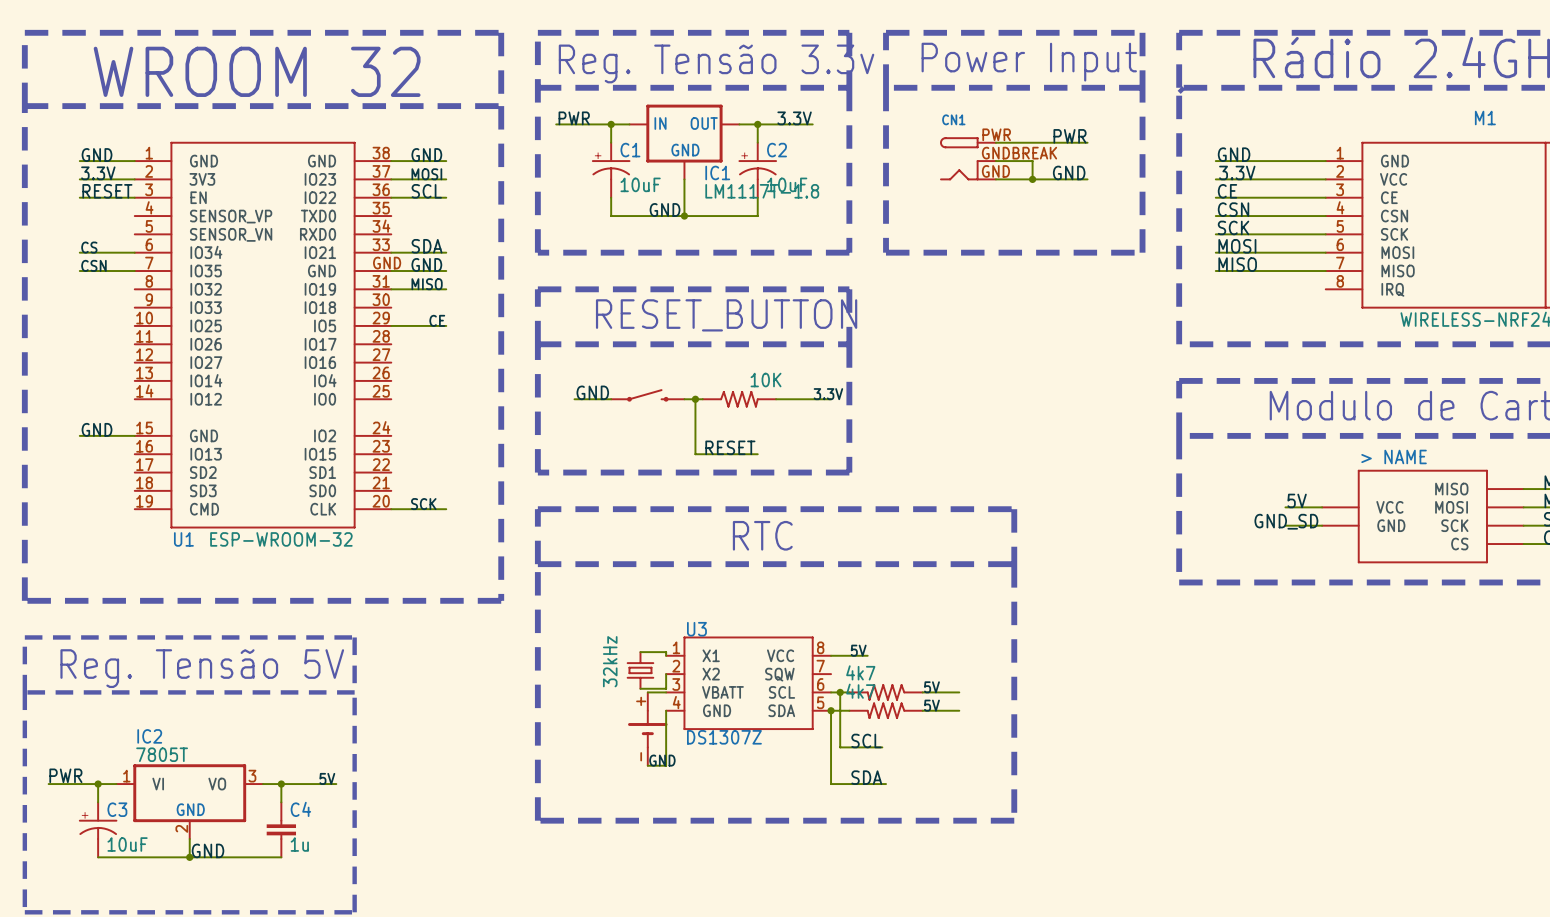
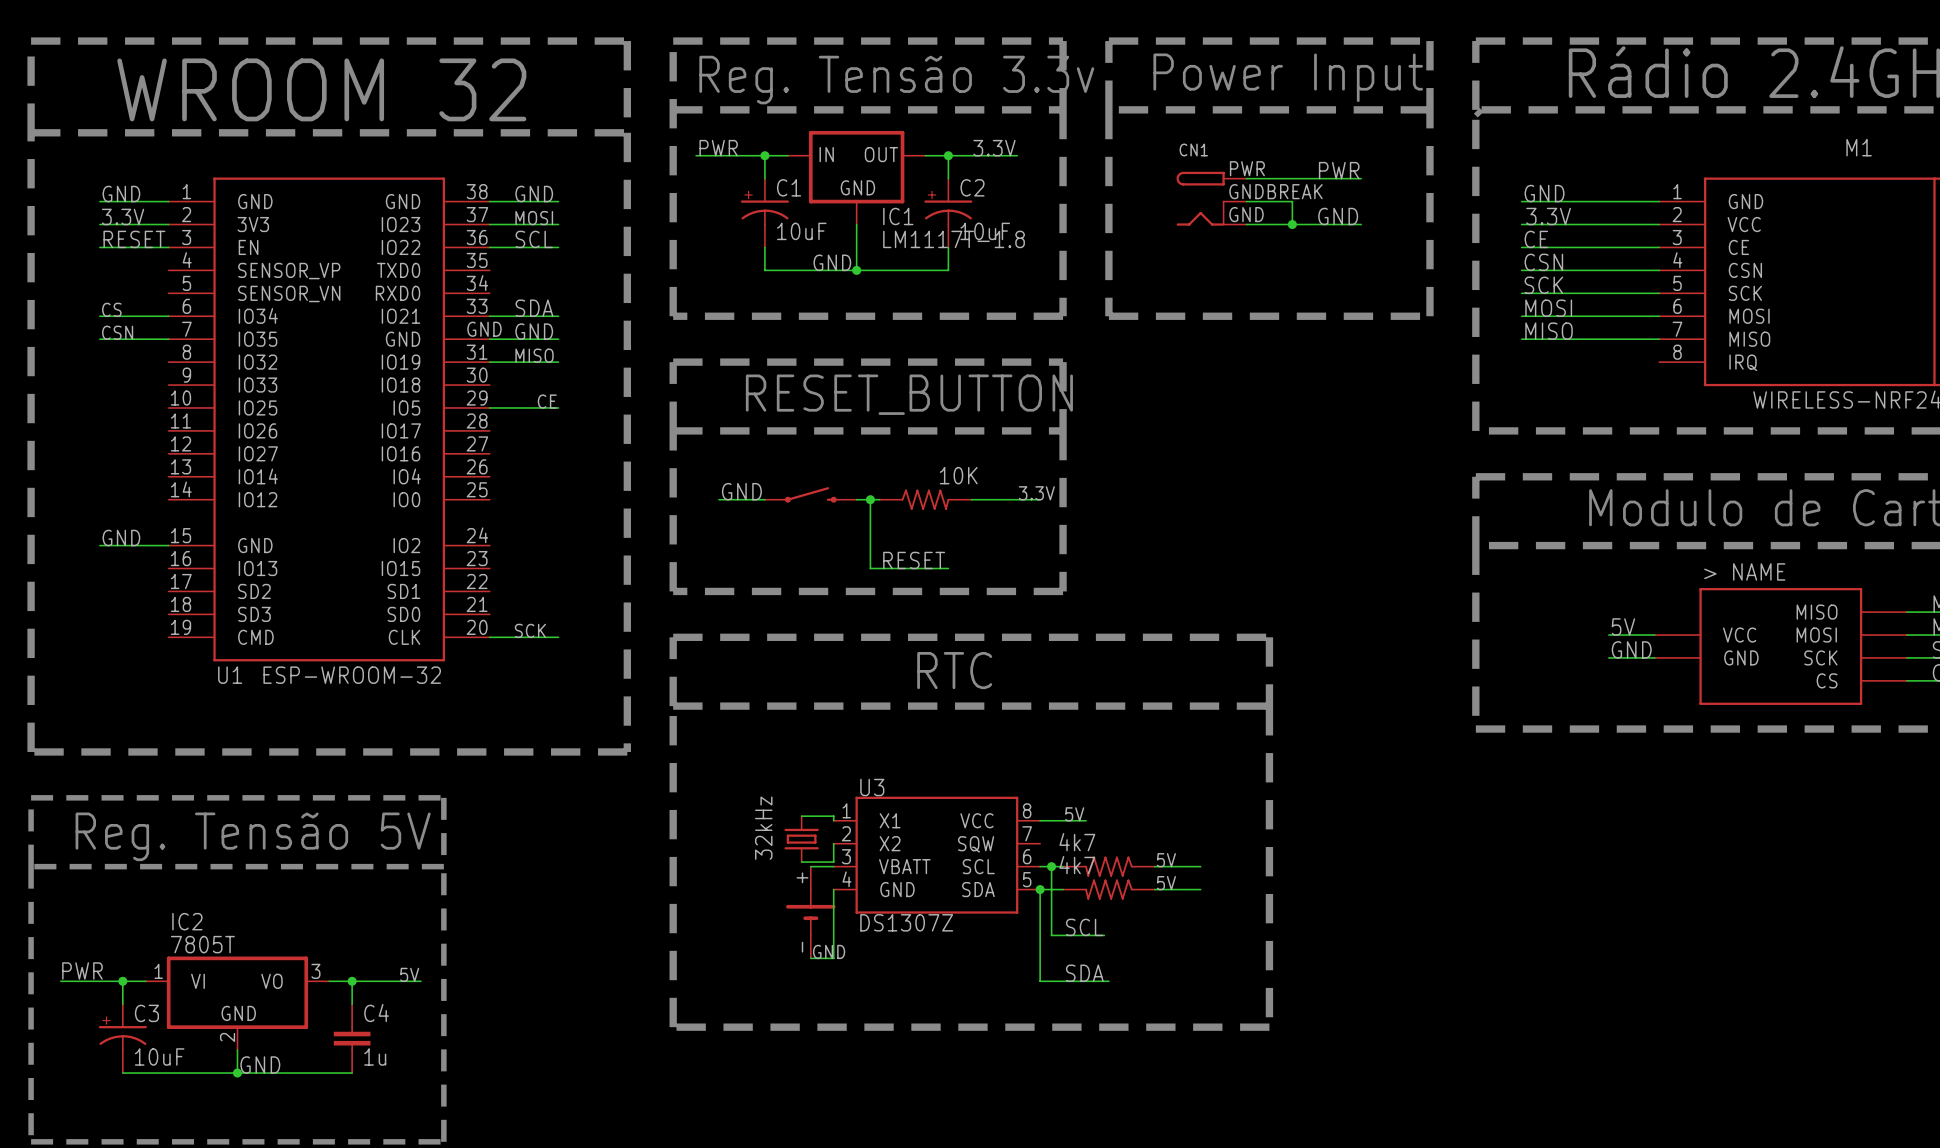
label: GND_SD (1286, 521) -> GND (1631, 649)

